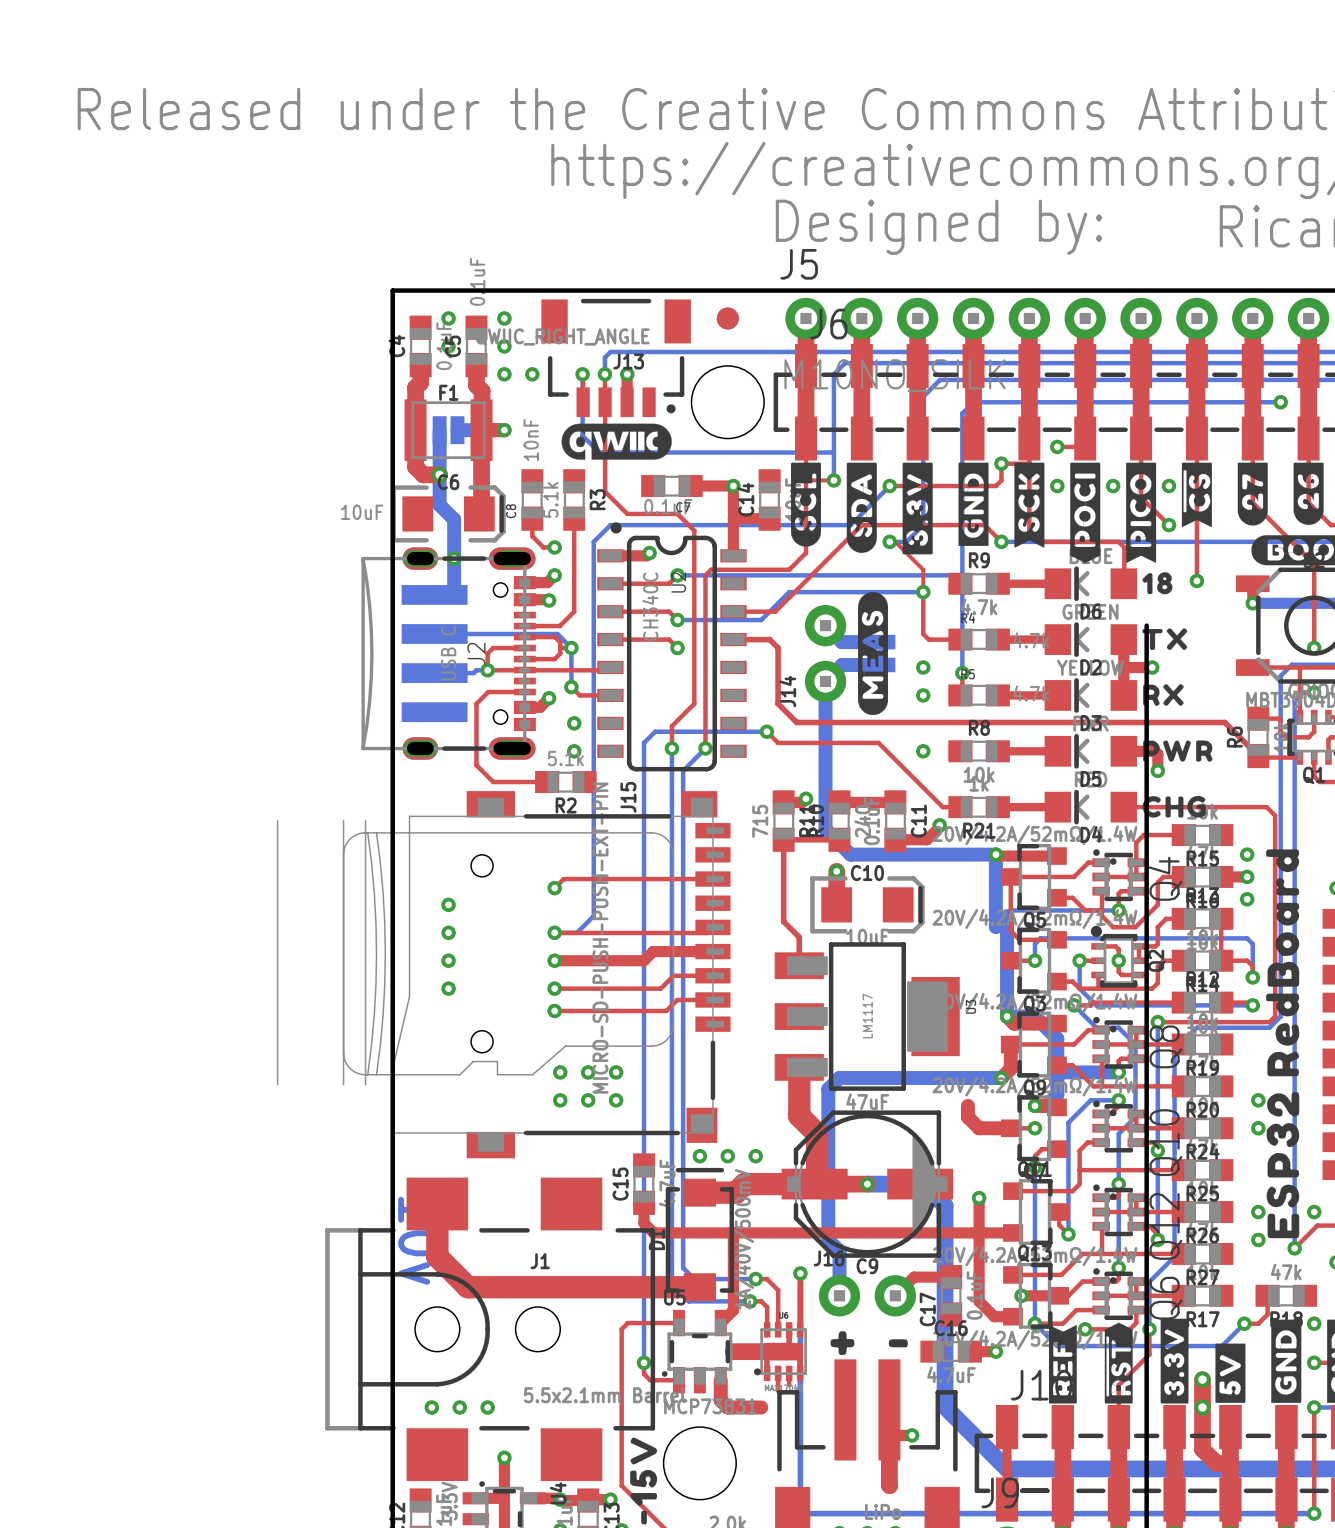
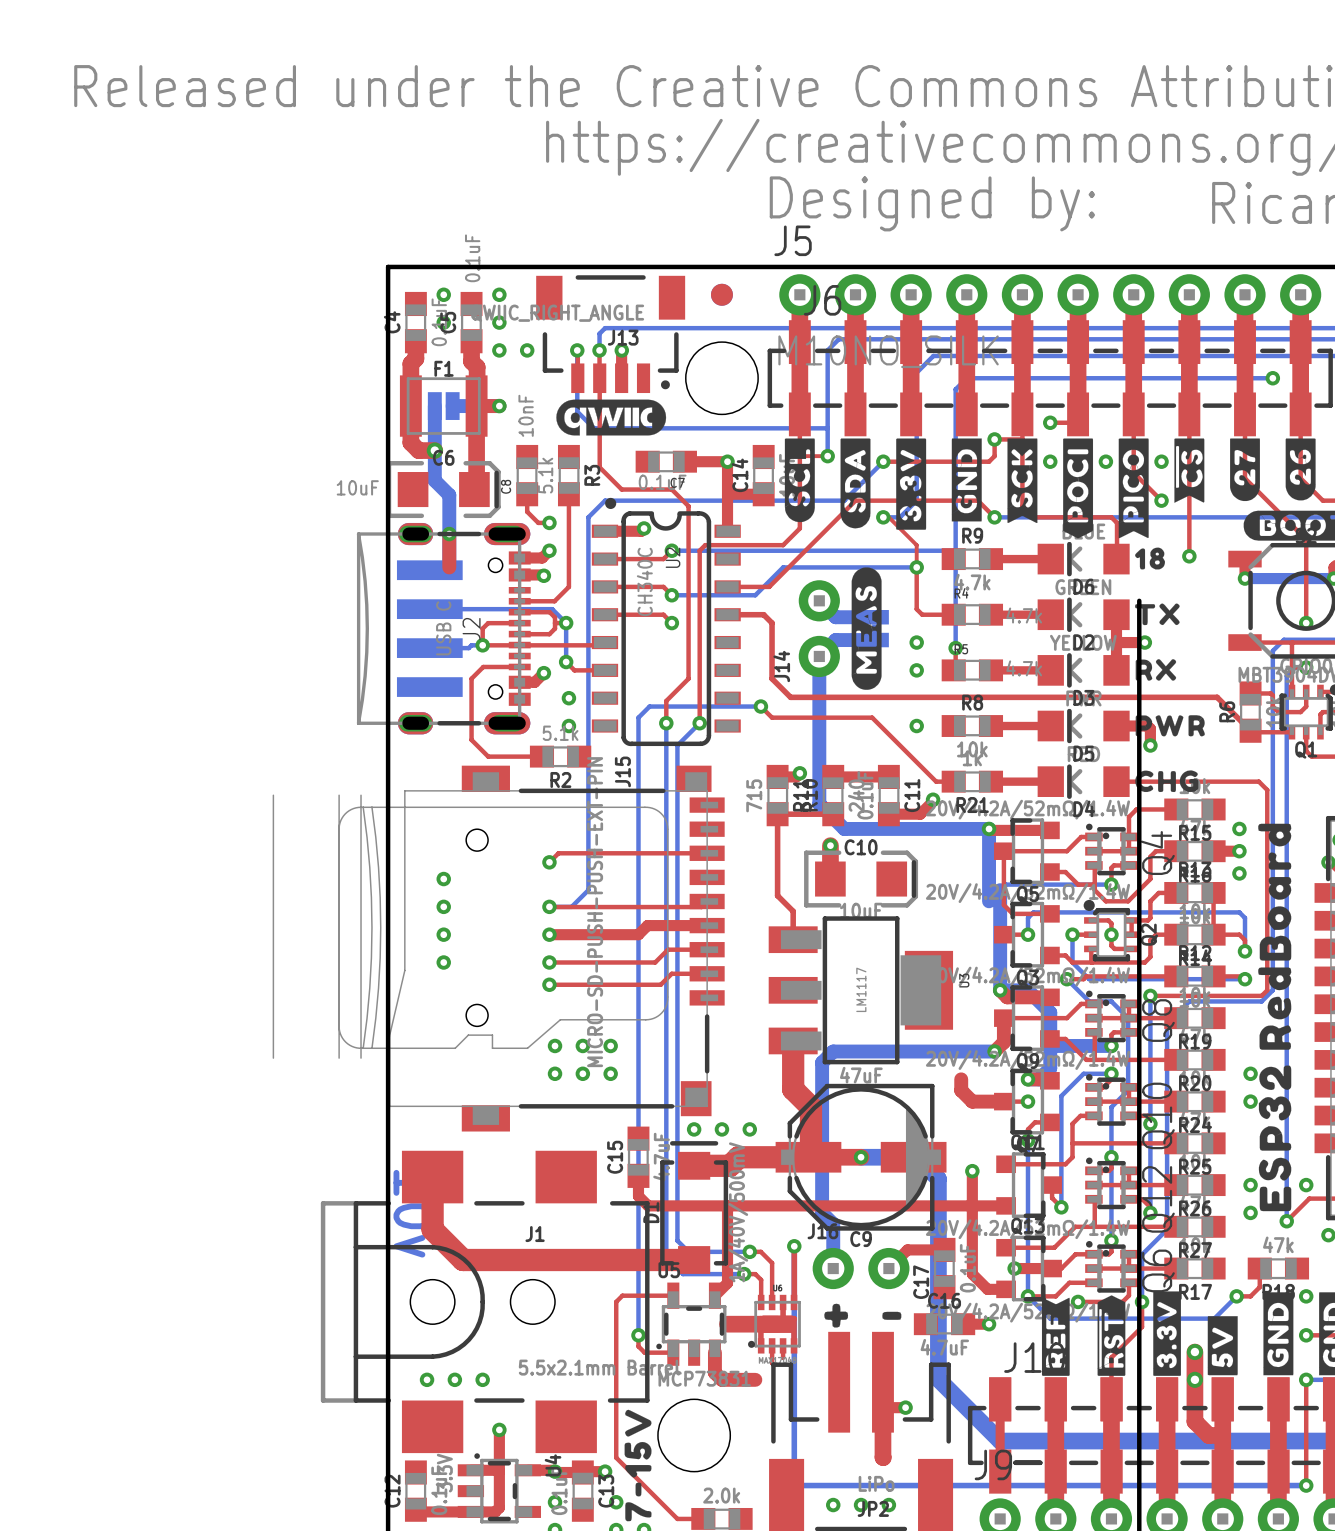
top track: none -> (449, 534) (449, 567)

